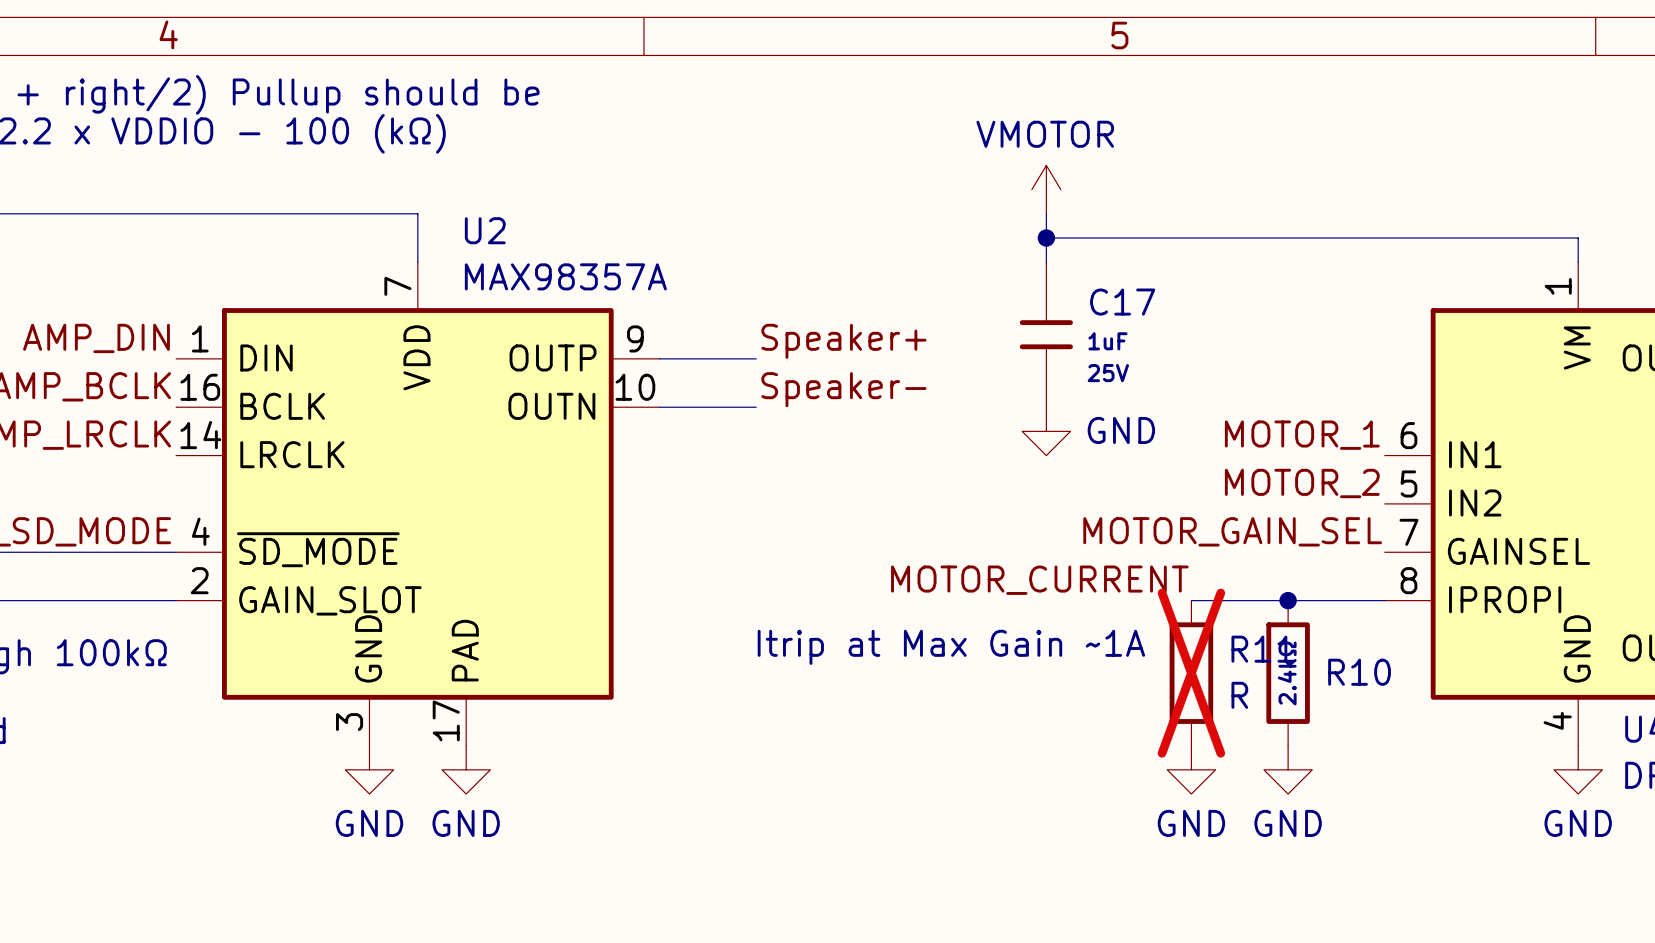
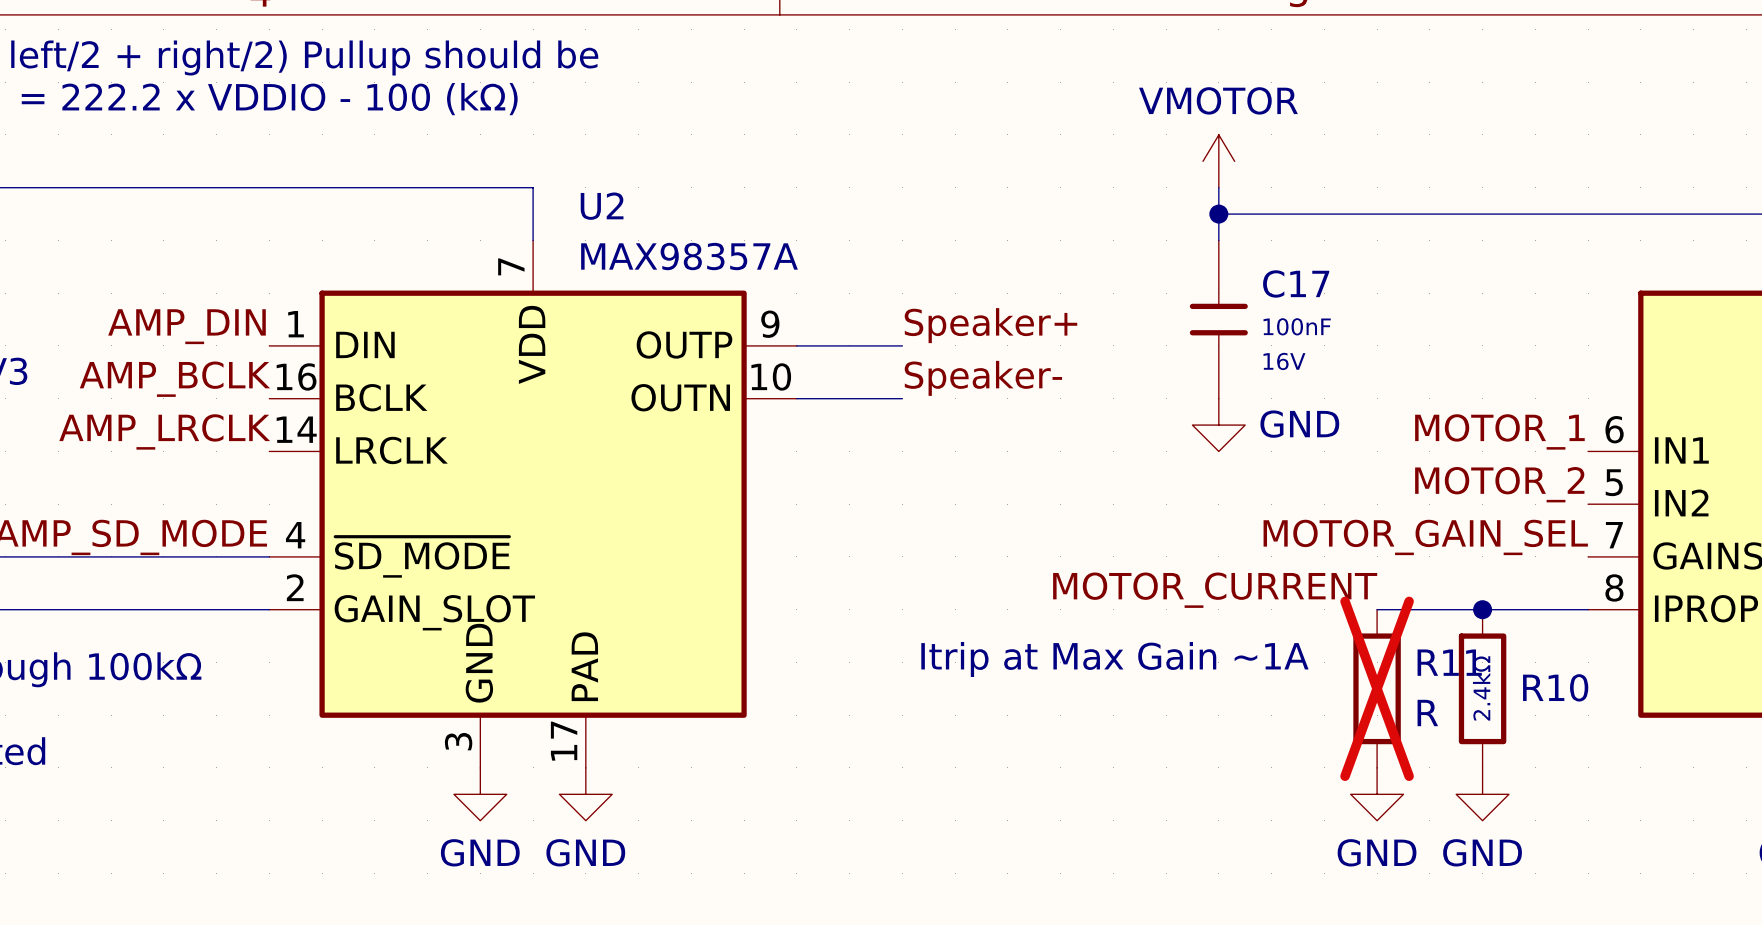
C17 value: 1uF (1107, 341) -> 100nF (1297, 326)
C17 text: 25V (1108, 373) -> 16V (1284, 361)

